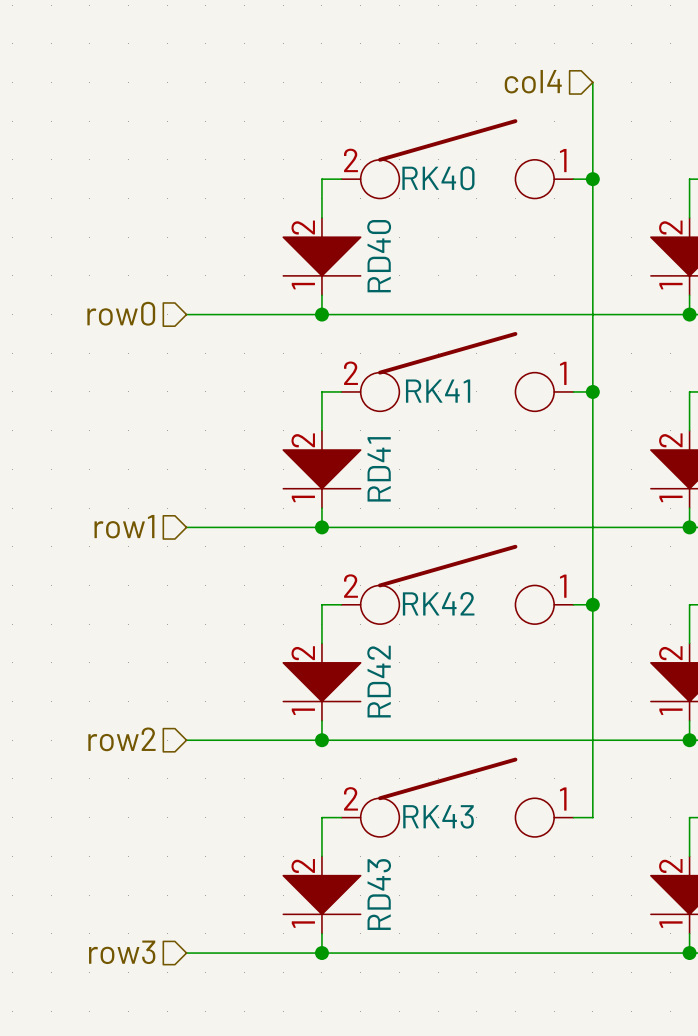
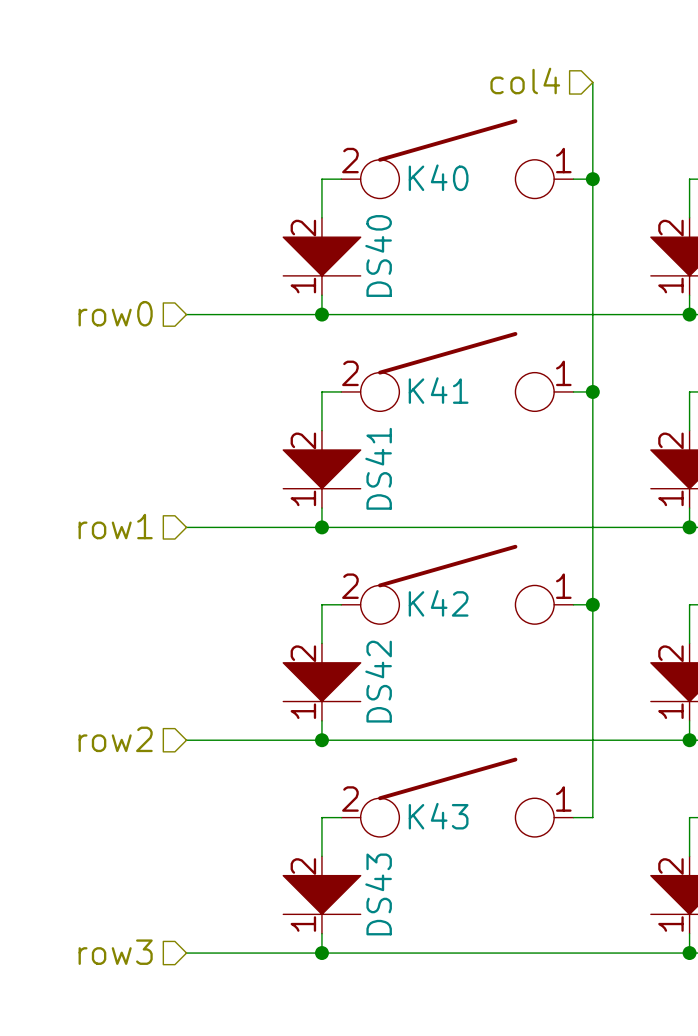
RK40 name: RK40 (438, 178) -> K40 (438, 177)
RD40 name: RD40 (379, 256) -> DS40 (378, 255)
RK41 name: RK41 (438, 391) -> K41 (438, 390)
RD41 name: RD41 (379, 469) -> DS41 (378, 468)
RK42 name: RK42 (438, 603) -> K42 (438, 603)
RD42 name: RD42 (379, 681) -> DS42 (378, 681)
RK43 name: RK43 (438, 816) -> K43 (438, 816)
RD43 name: RD43 (379, 894) -> DS43 (378, 894)

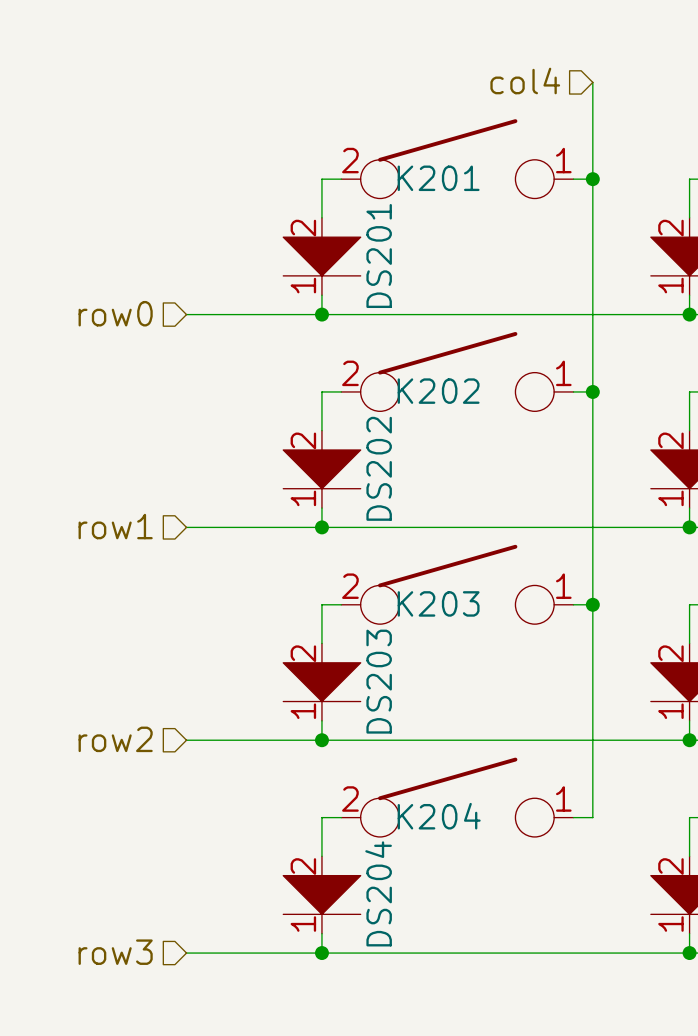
K40 name: K40 (438, 177) -> K201 (438, 178)
DS40 name: DS40 (378, 255) -> DS201 (379, 255)
K41 name: K41 (438, 390) -> K202 (438, 391)
DS41 name: DS41 (378, 468) -> DS202 (379, 468)
K42 name: K42 (438, 603) -> K203 (438, 603)
DS42 name: DS42 (378, 681) -> DS203 (379, 681)
K43 name: K43 (438, 816) -> K204 (439, 816)
DS43 name: DS43 (378, 894) -> DS204 (378, 893)

